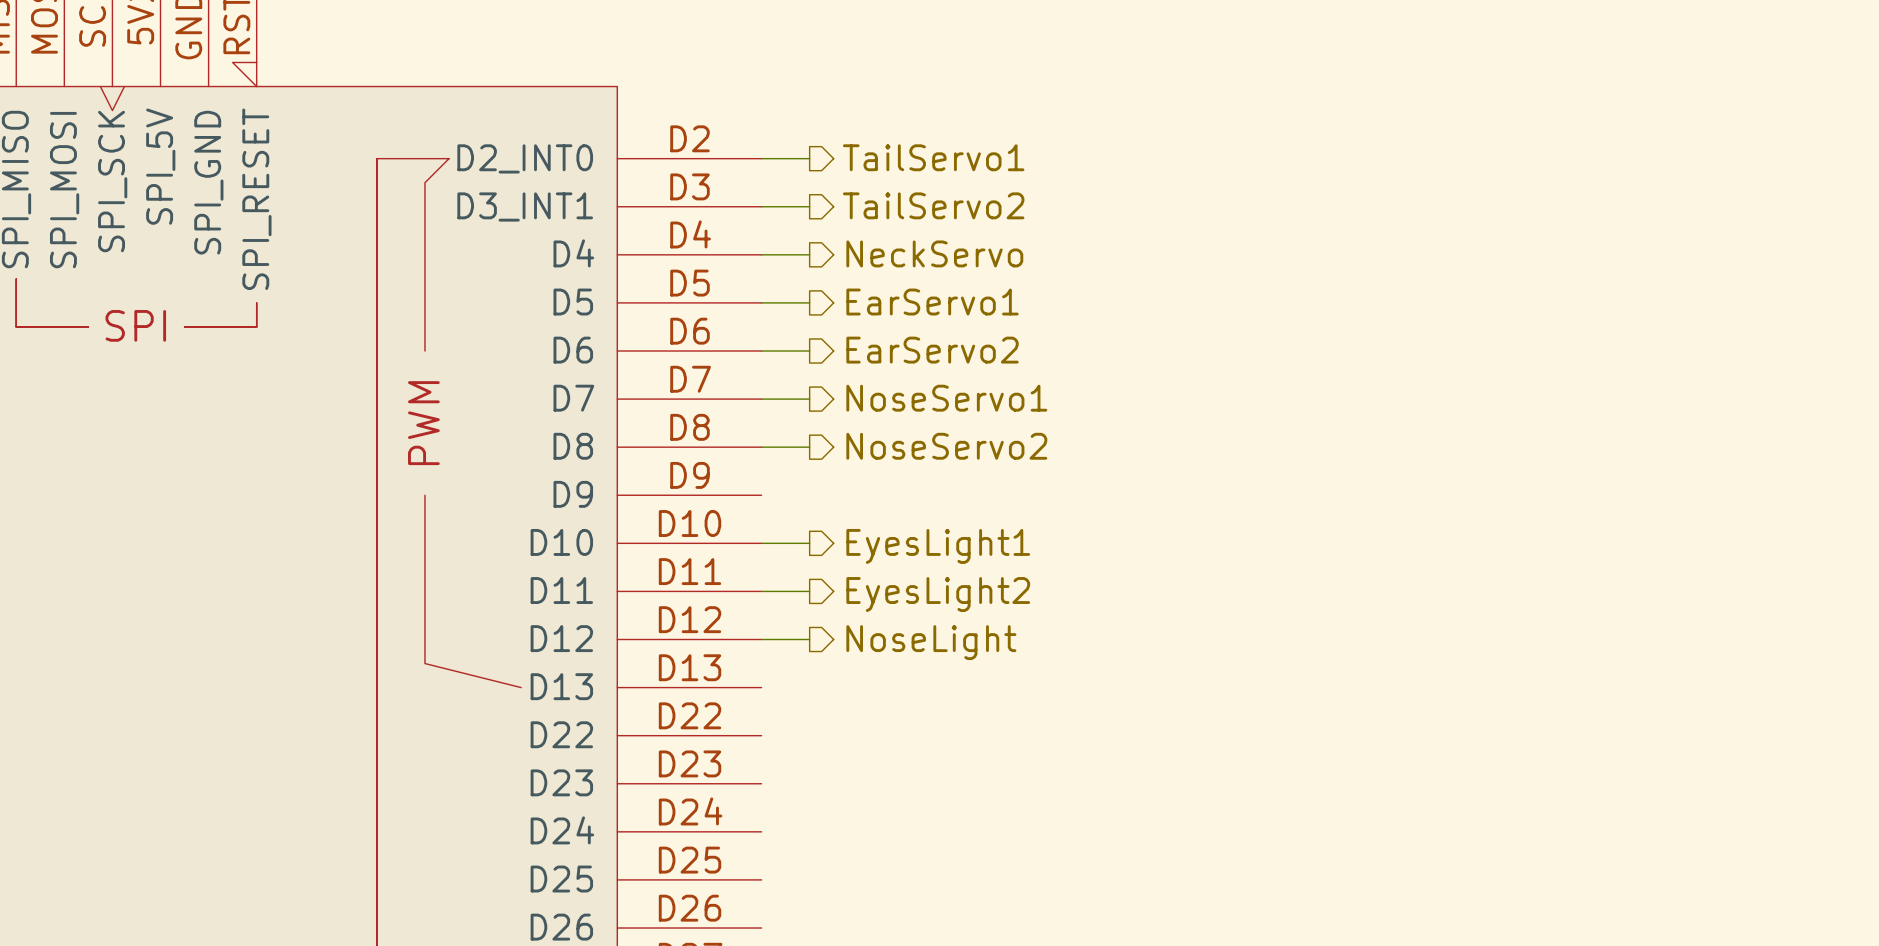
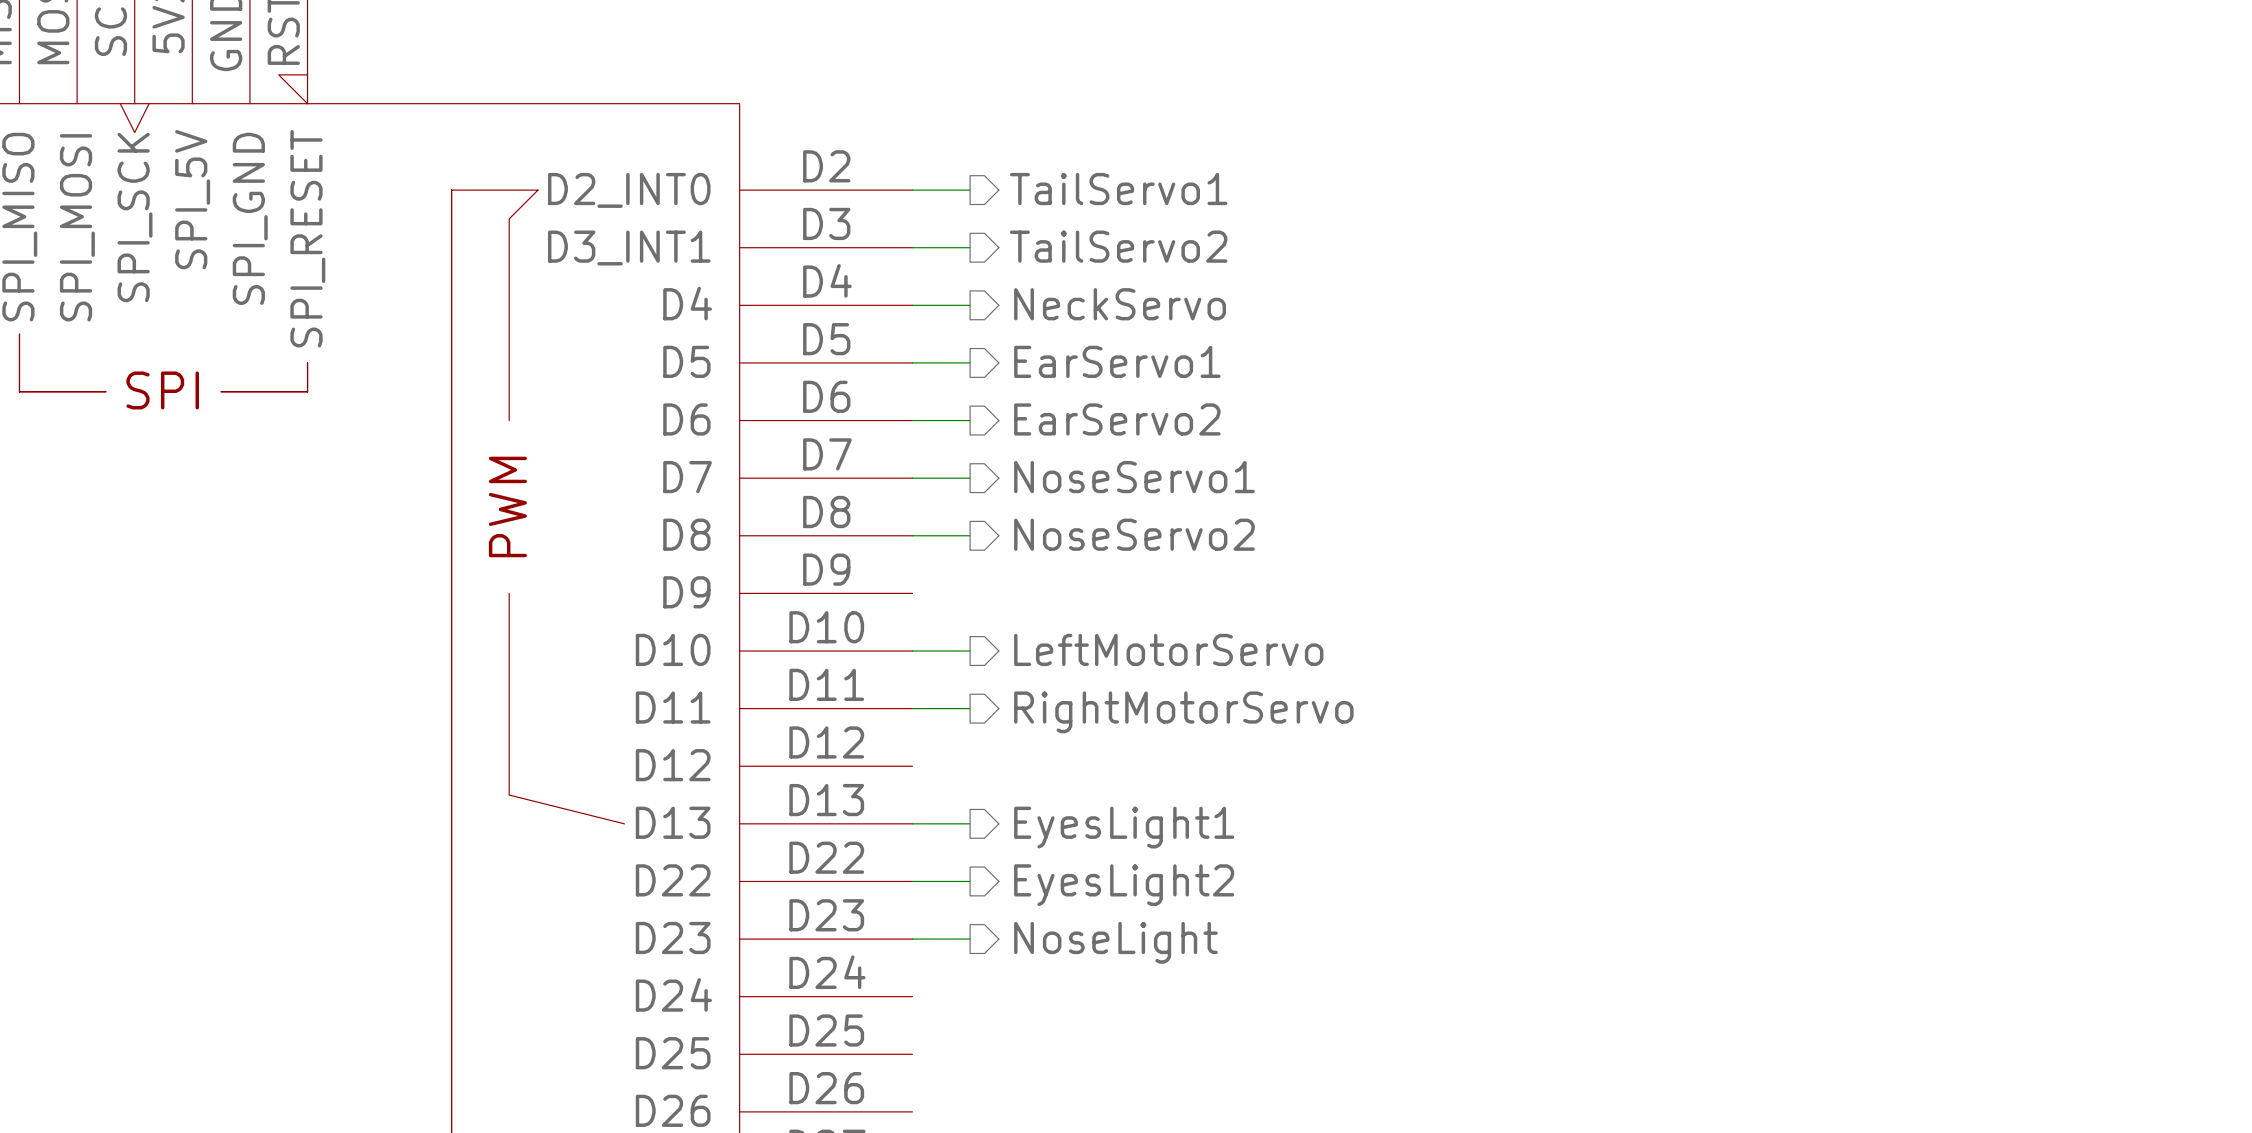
hierarchical label: EyesLight1 (938, 546) -> LeftMotorServo (1168, 649)
hierarchical label: EyesLight2 (938, 594) -> RightMotorServo (1183, 712)
wire: (761, 639) (809, 639) -> (912, 823) (970, 823)
hierarchical label position: NoseLight (931, 642) -> NoseLight (1115, 942)
hierarchical label: none -> EyesLight1 (1124, 827)
wire: none -> (912, 881) (970, 881)
hierarchical label: none -> EyesLight2 (1124, 885)
wire: none -> (912, 939) (970, 939)

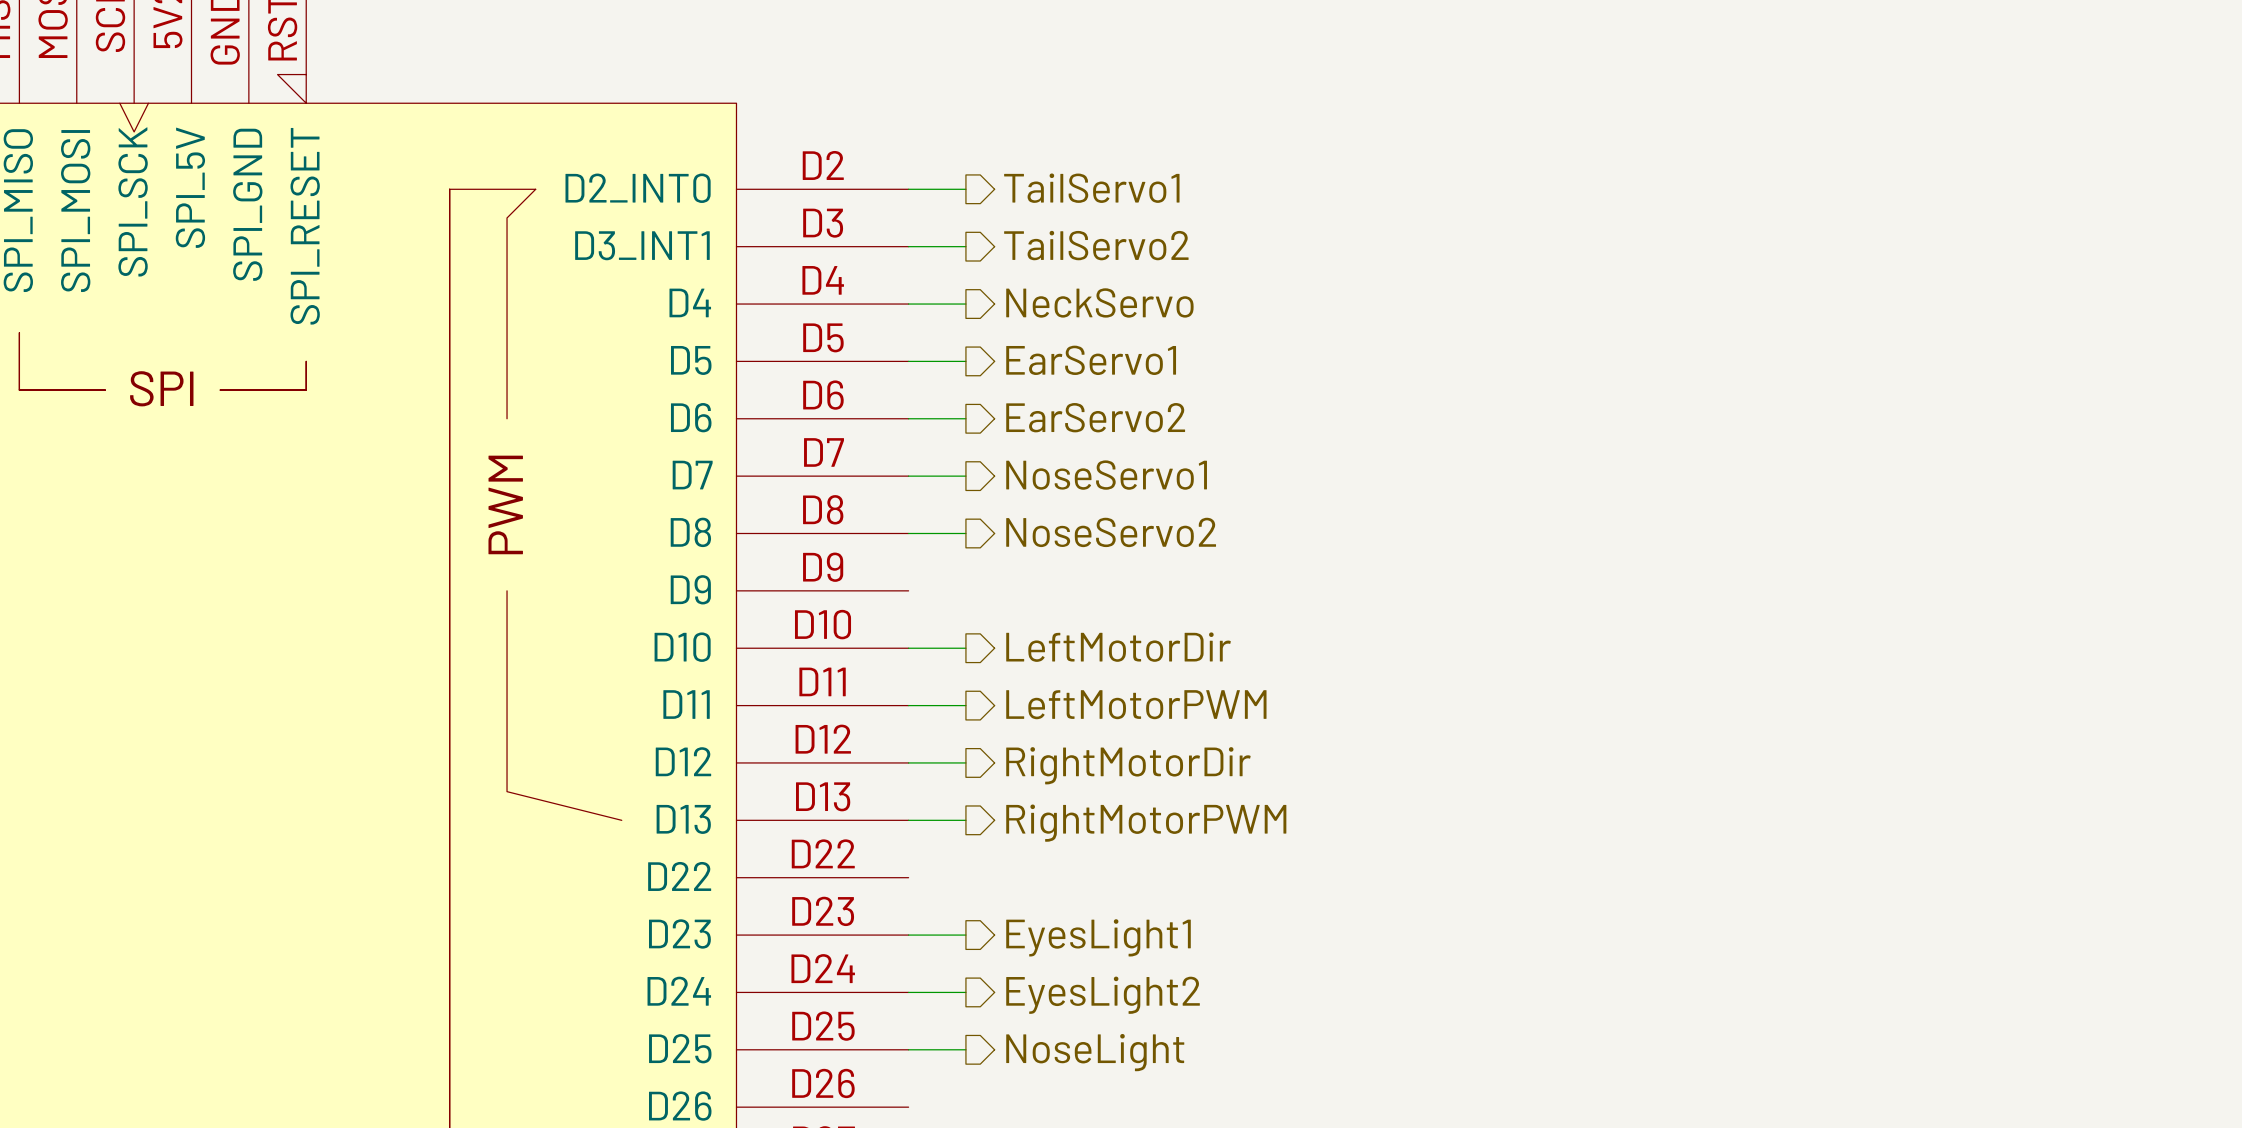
hierarchical label: LeftMotorServo (1168, 649) -> LeftMotorDir (1118, 647)
hierarchical label: RightMotorServo (1183, 712) -> LeftMotorPWM (1136, 704)
hierarchical label: none -> RightMotorDir (1128, 765)
hierarchical label: EyesLight1 (1124, 827) -> RightMotorPWM (1146, 823)
wire: (912, 881) (970, 881) -> (908, 762) (965, 762)
hierarchical label position: EyesLight2 (1124, 885) -> EyesLight2 (1103, 995)
hierarchical label: NoseLight (1115, 942) -> EyesLight1 (1098, 937)
wire: none -> (908, 992) (965, 992)
wire: none -> (908, 1049) (965, 1049)
hierarchical label: none -> NoseLight (1095, 1052)

